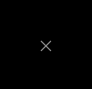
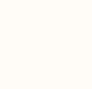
no-connect mark: (45, 45) -> none

